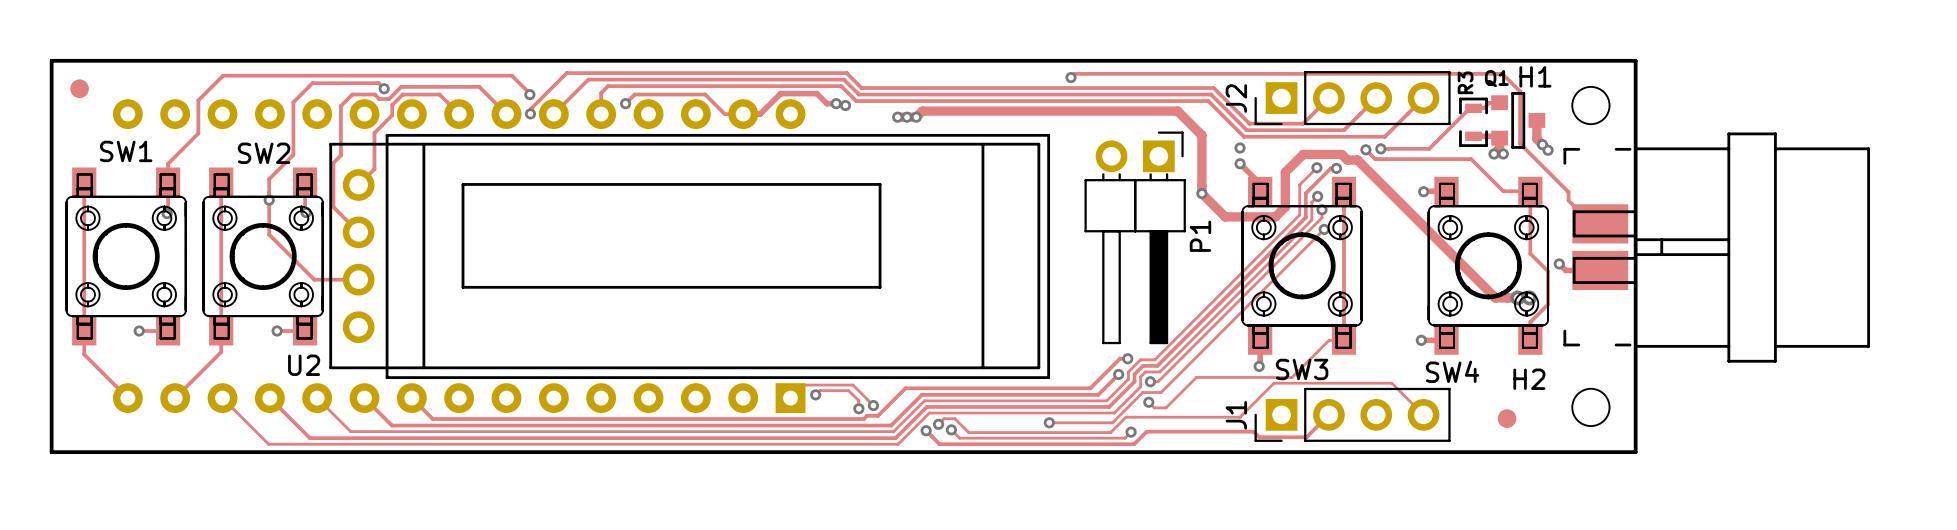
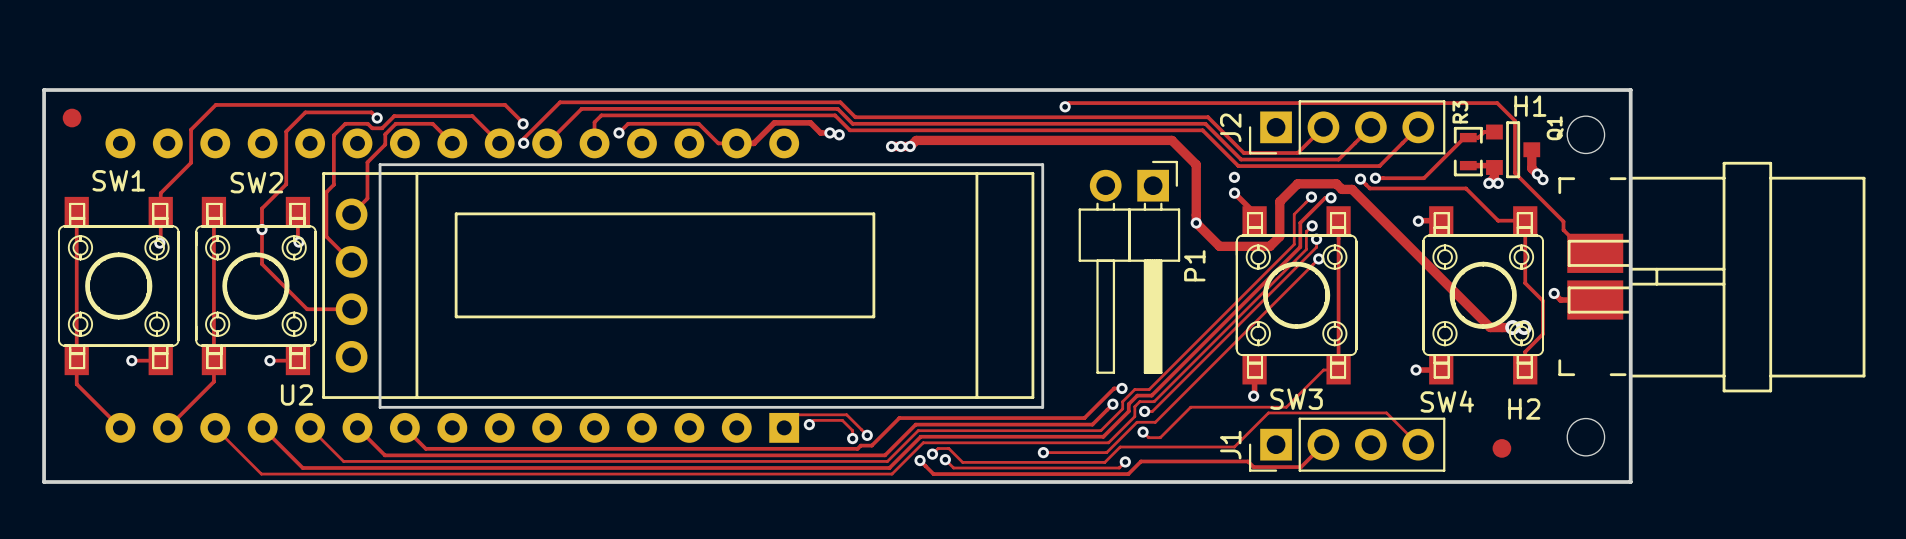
Q1 name rotation: 0° (1496, 78) -> 90° counterclockwise (1555, 128)
Q1 name position: Q1 (1496, 78) -> Q1 (1555, 128)

